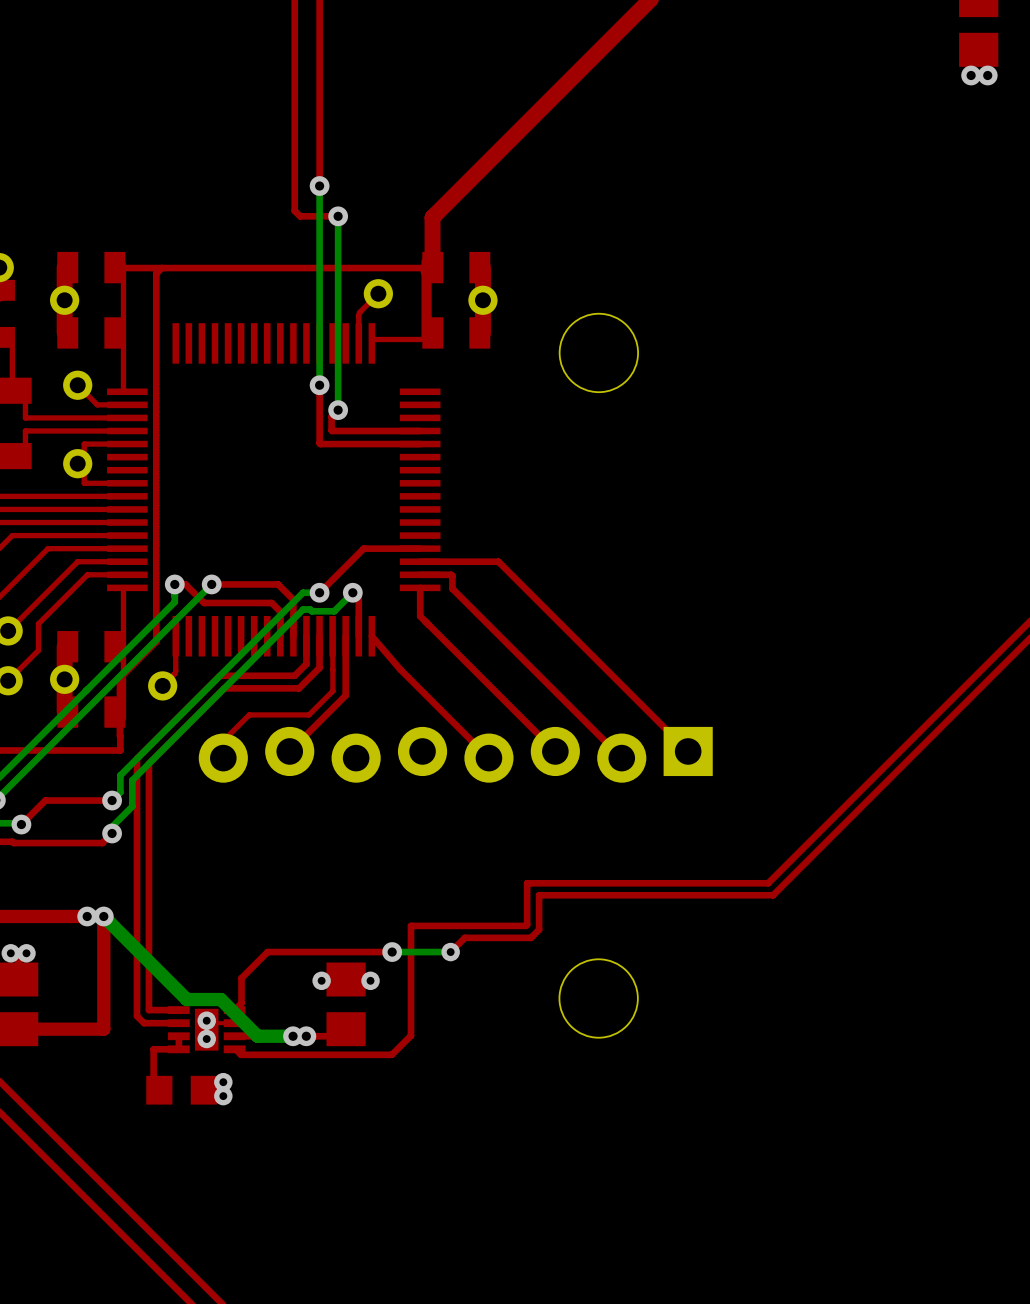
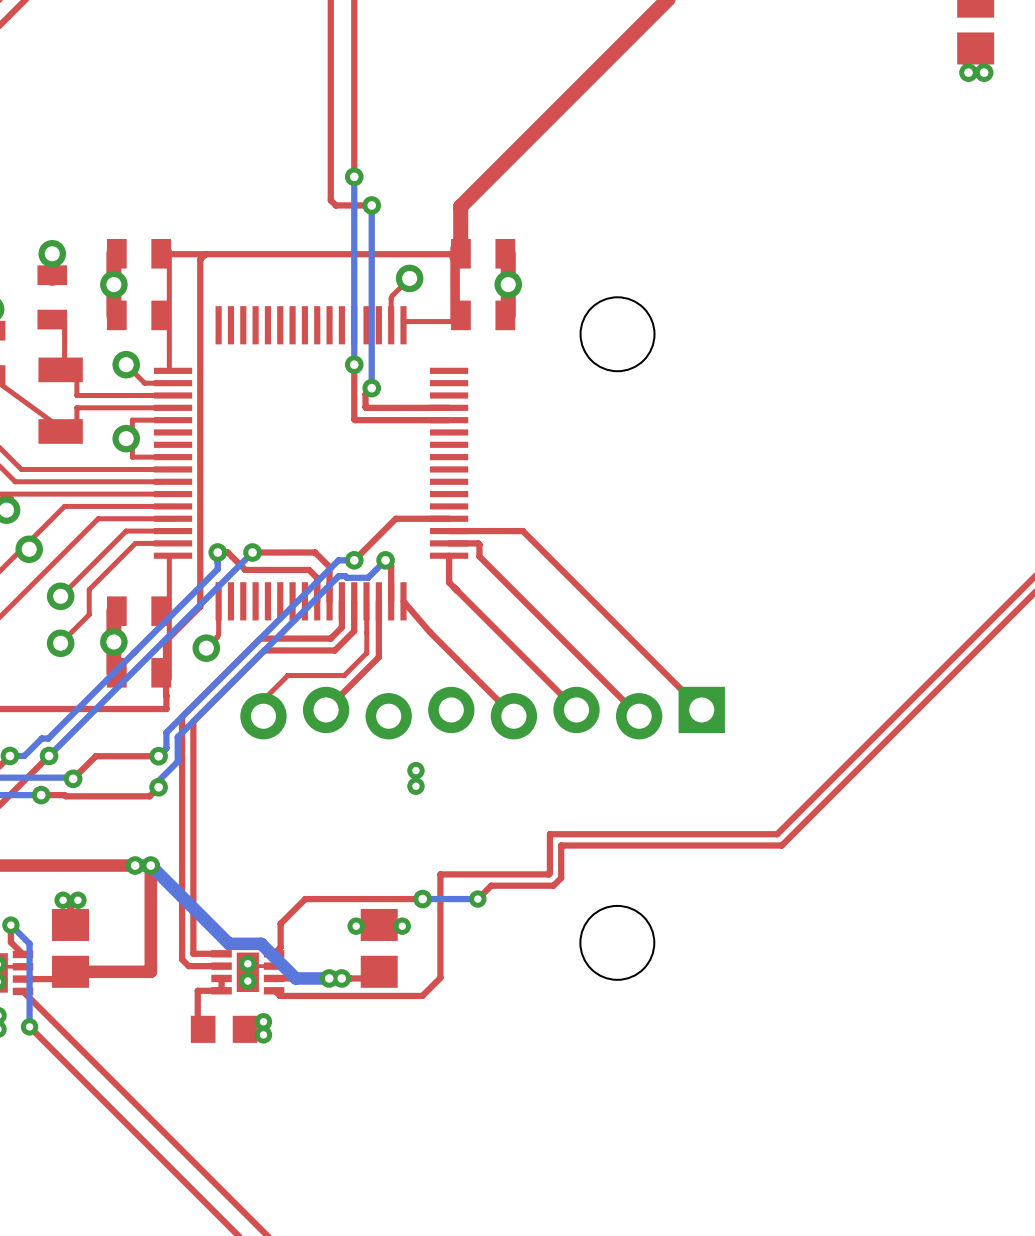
via: none -> (415, 770)
via: none -> (415, 786)

